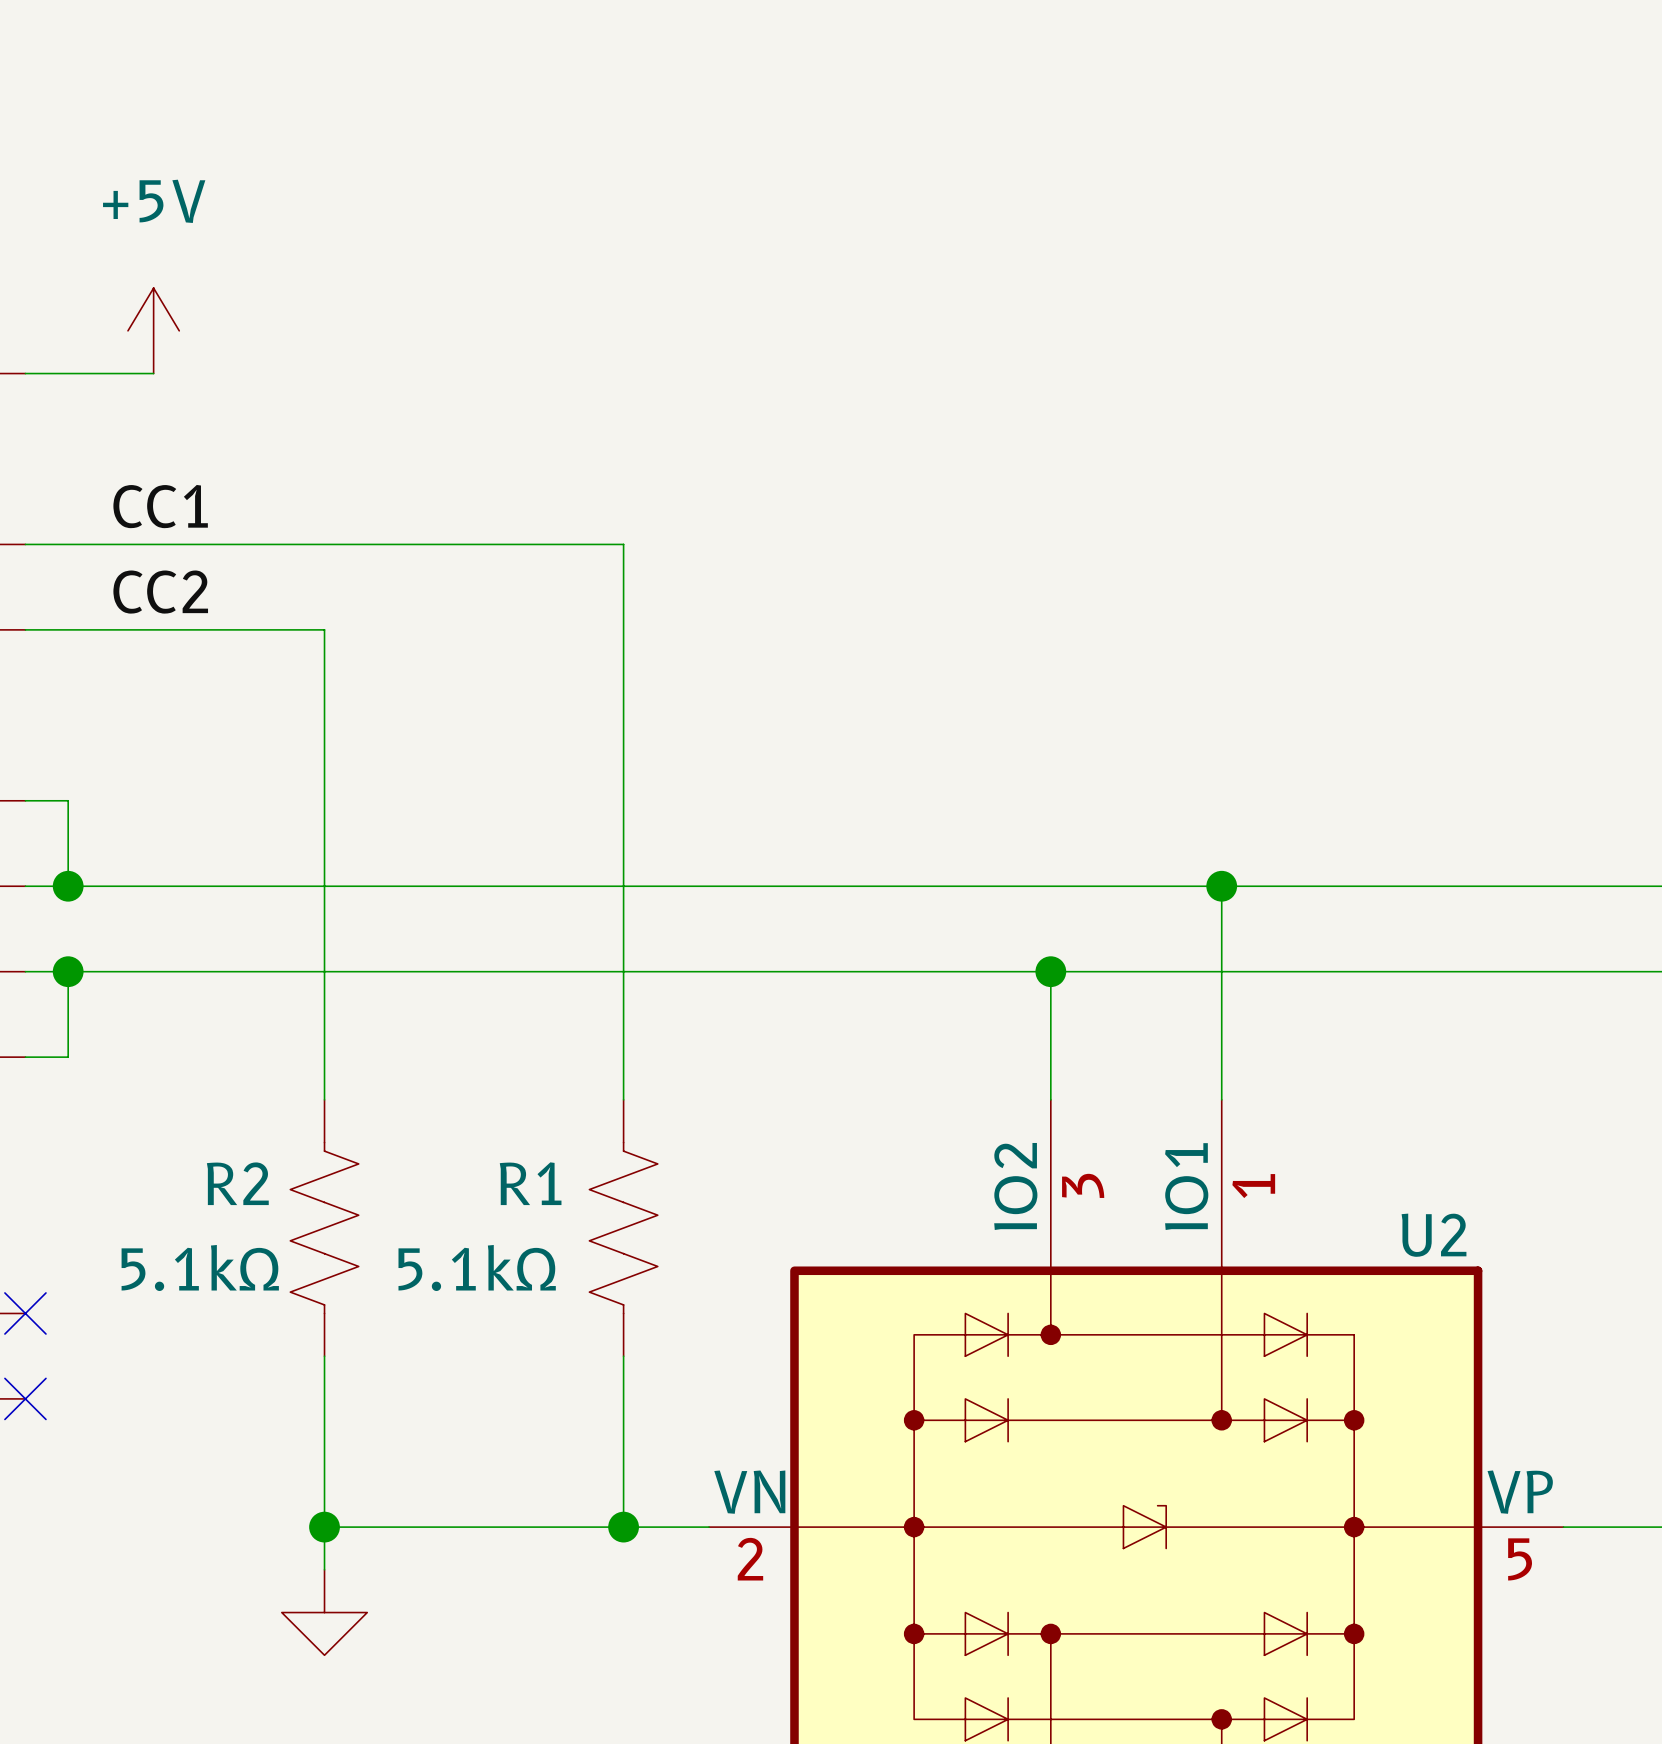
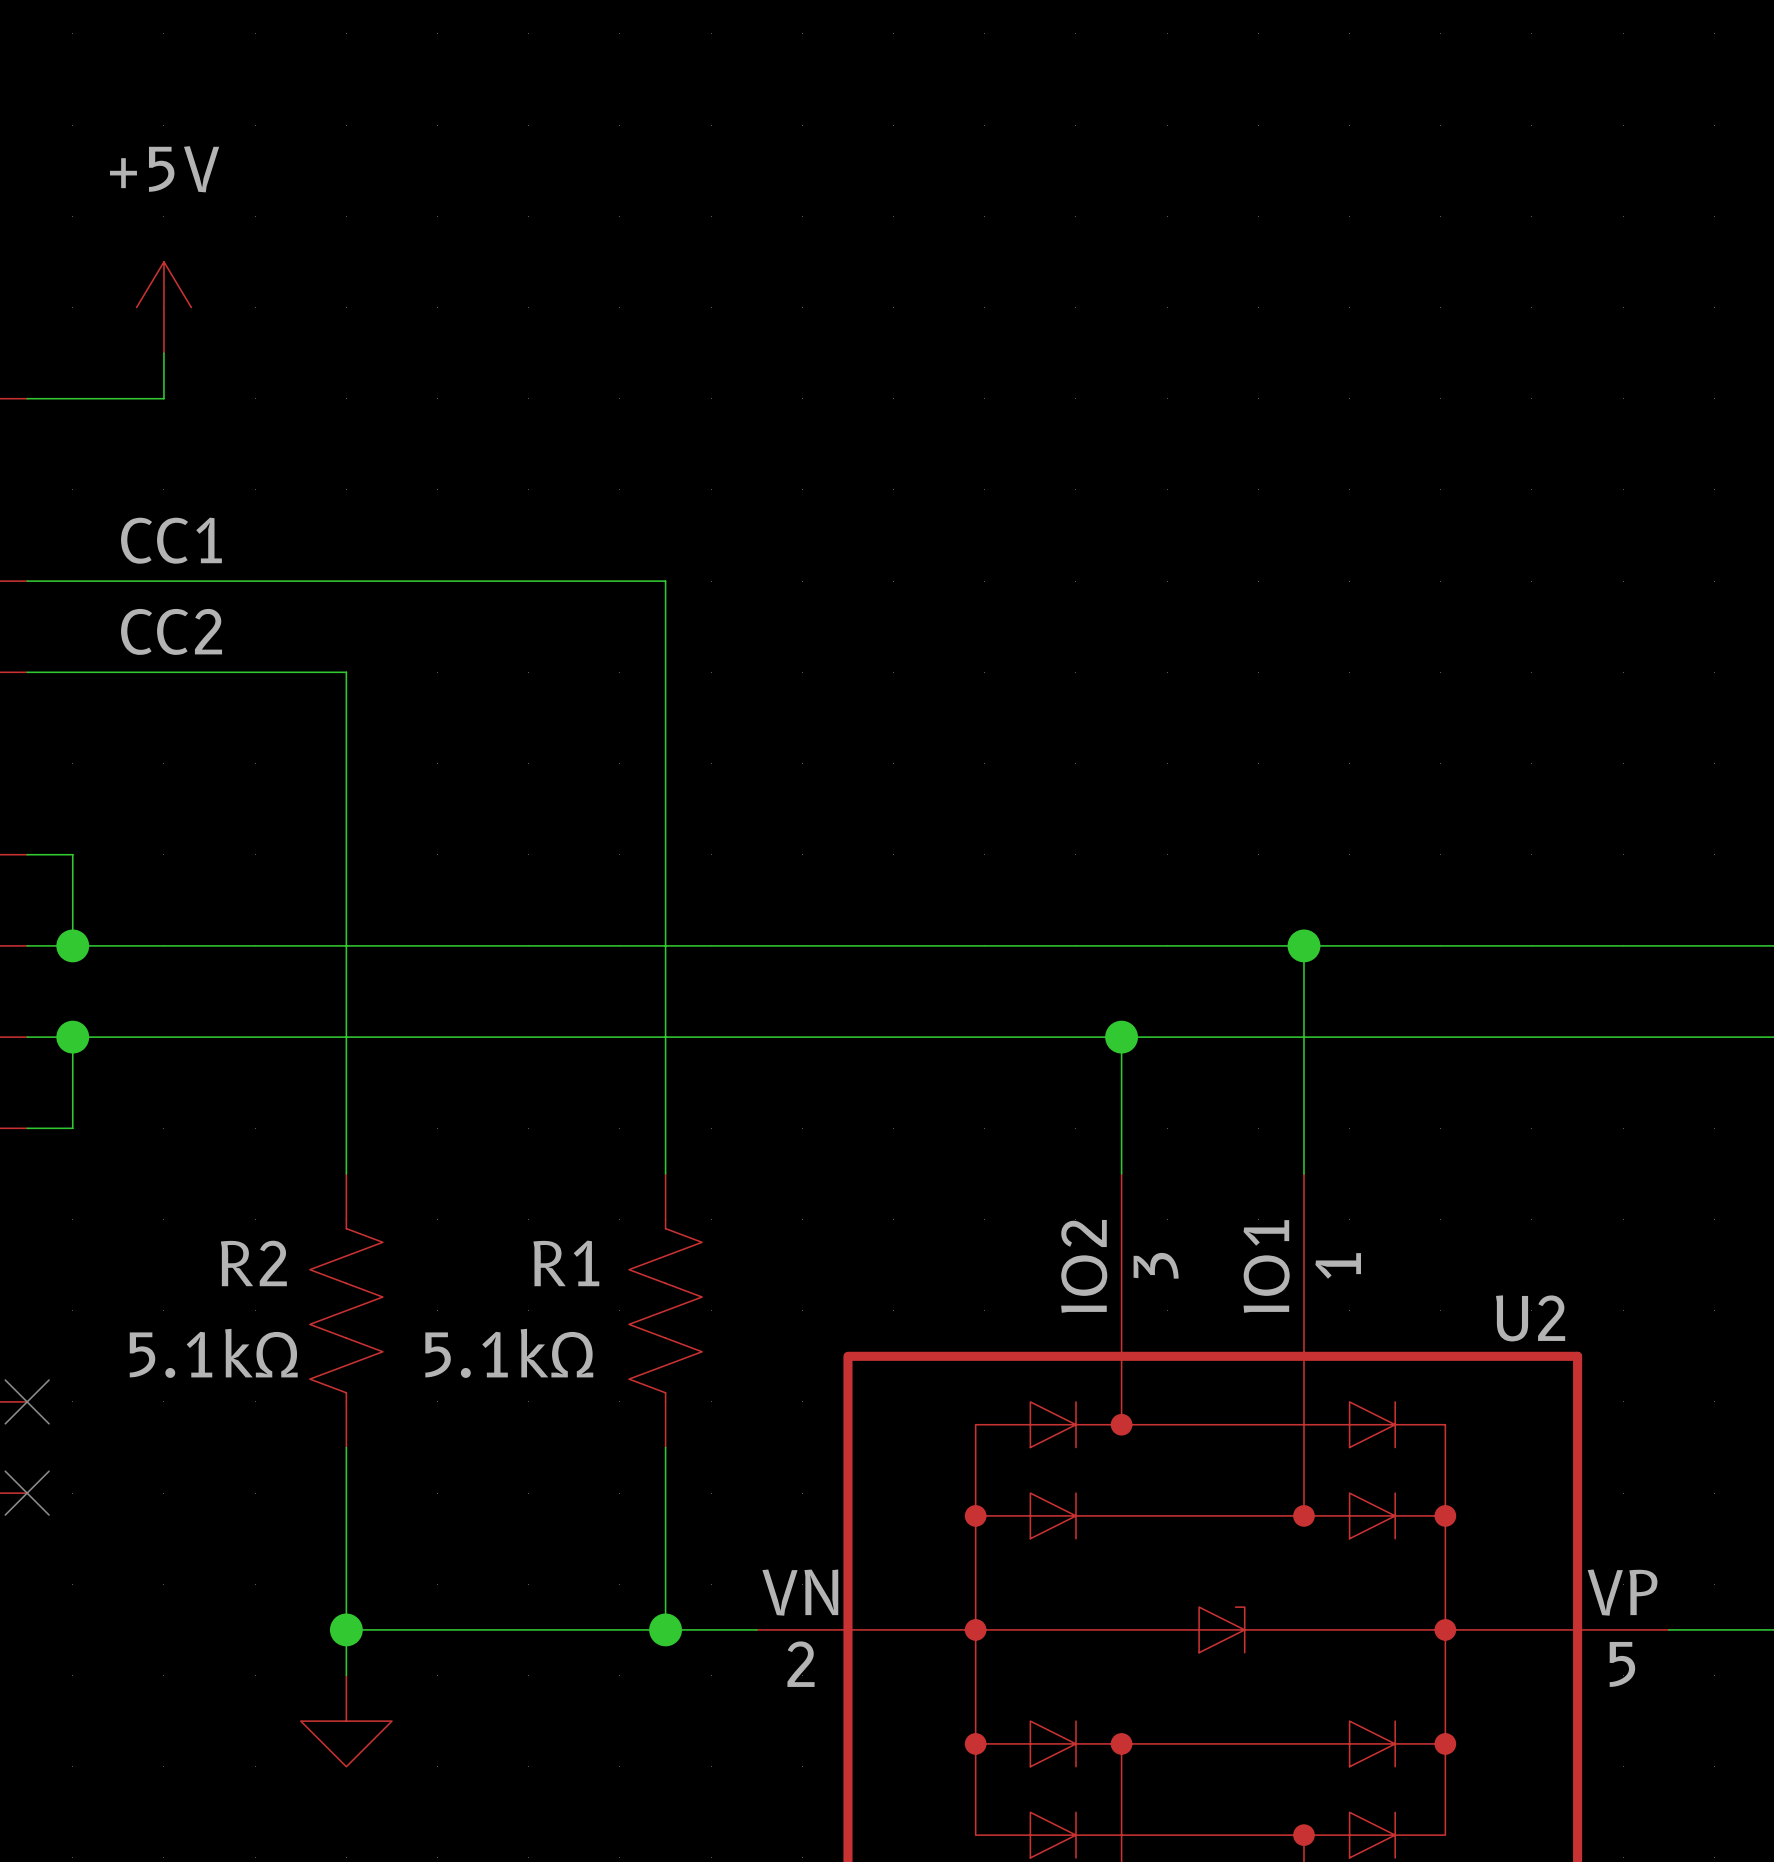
power symbol position: +5V (153, 330) -> +5V (163, 307)

